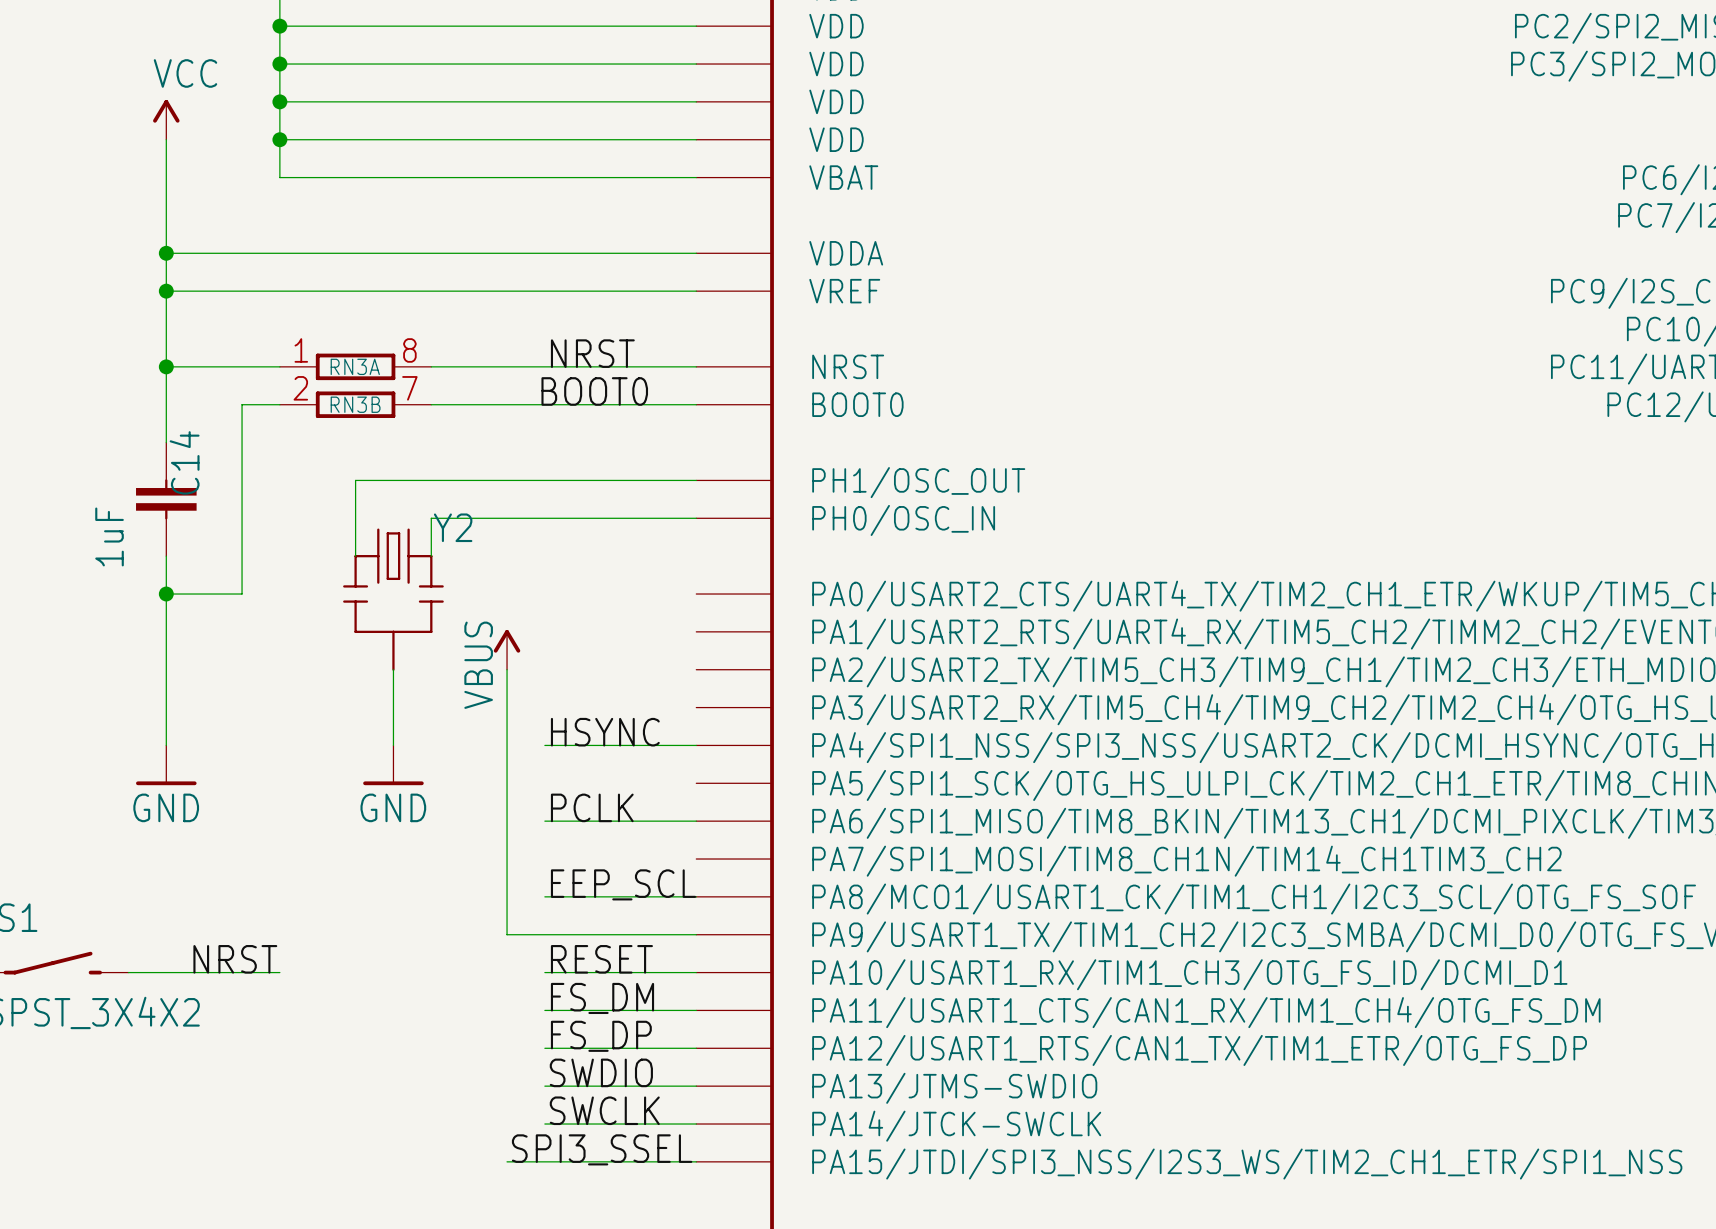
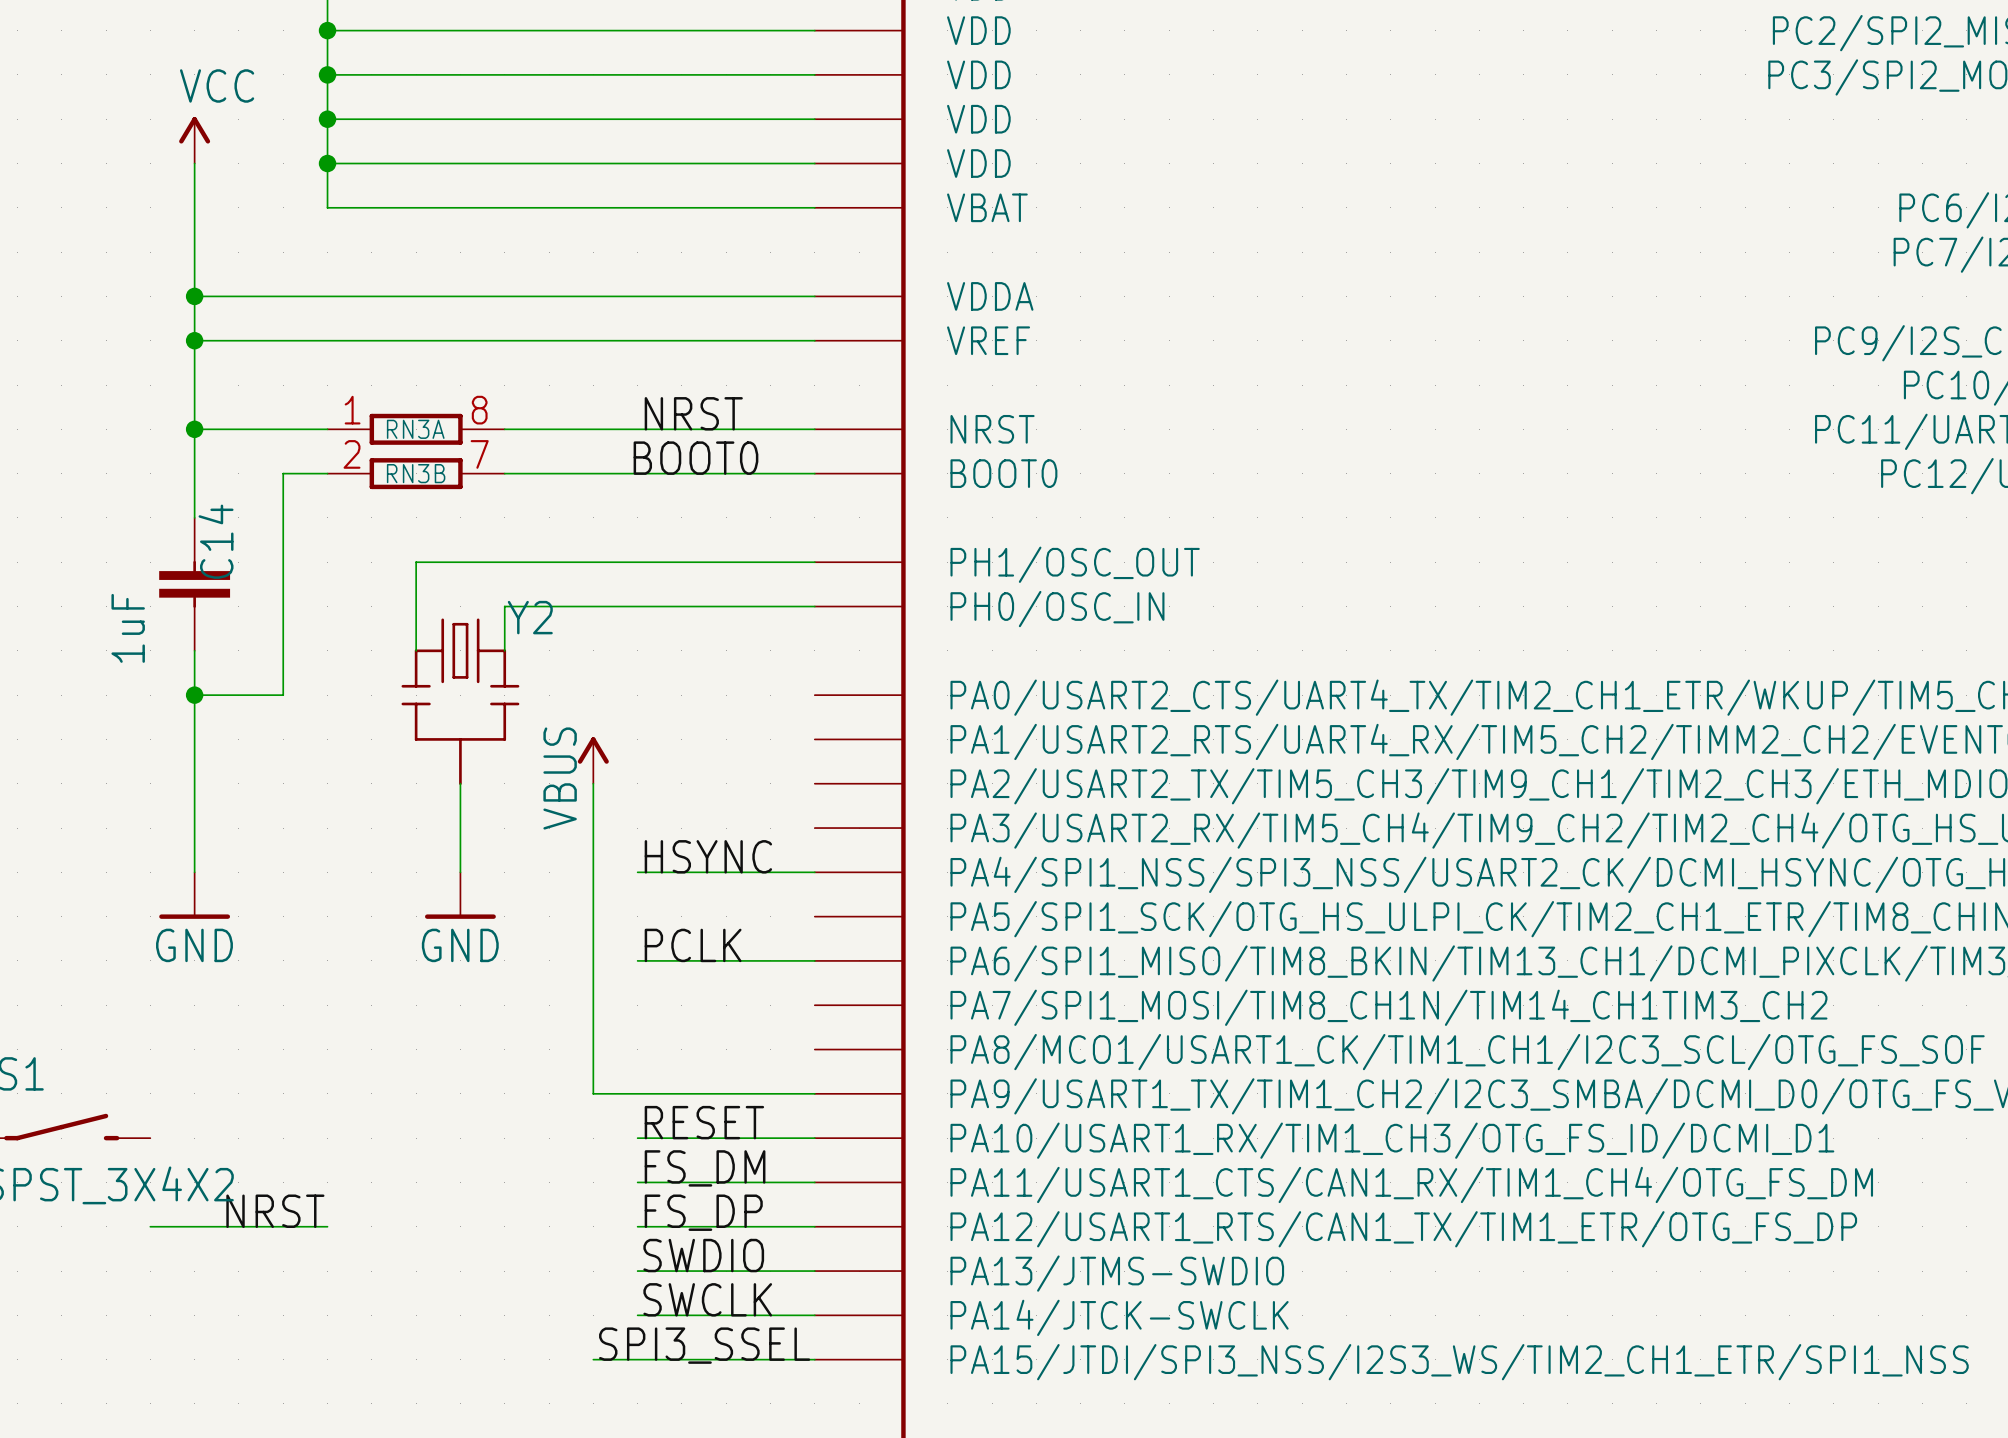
label: EEP_SCL (623, 884) -> none
wire: (544, 896) (696, 896) -> none
label position: NRST (235, 959) -> NRST (275, 1211)
wire: (128, 972) (279, 972) -> (150, 1226) (327, 1226)

